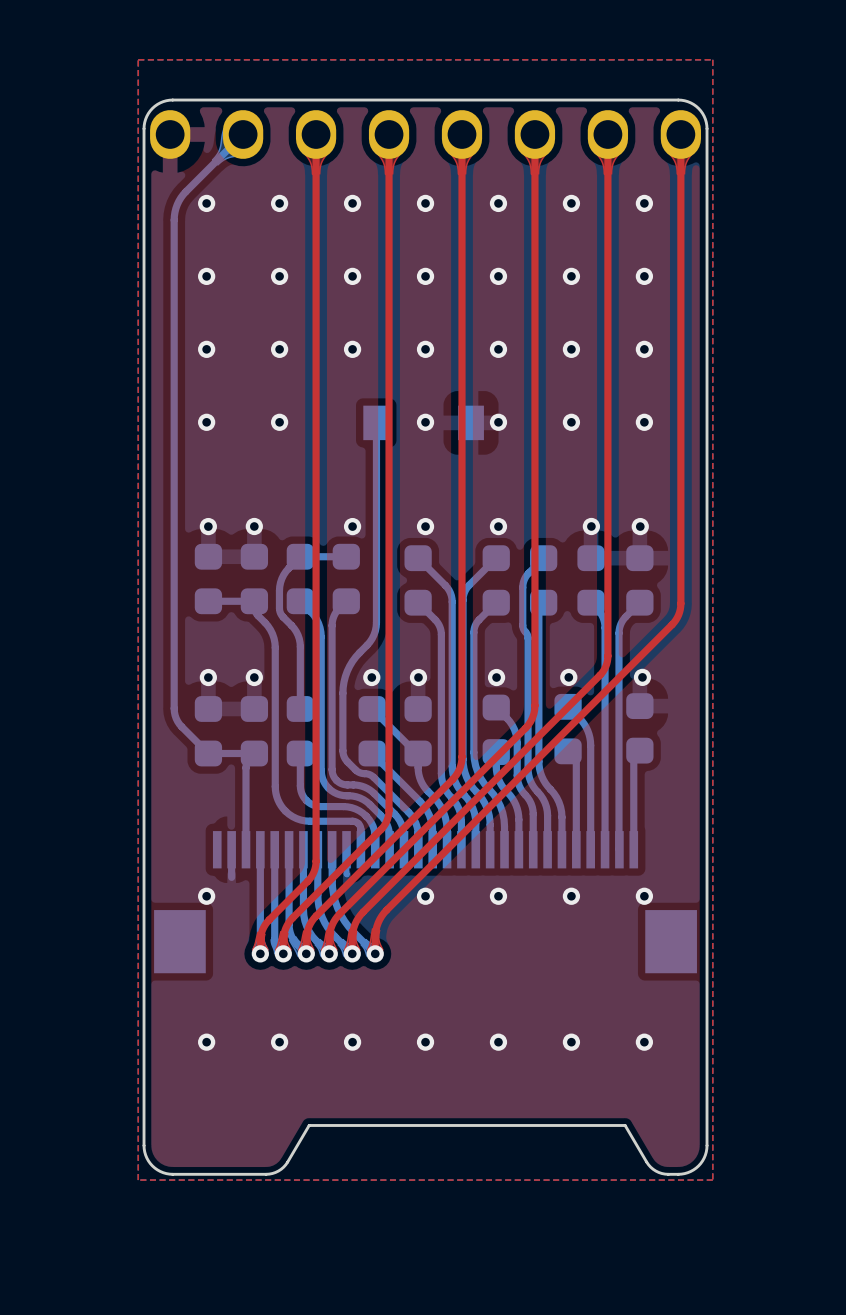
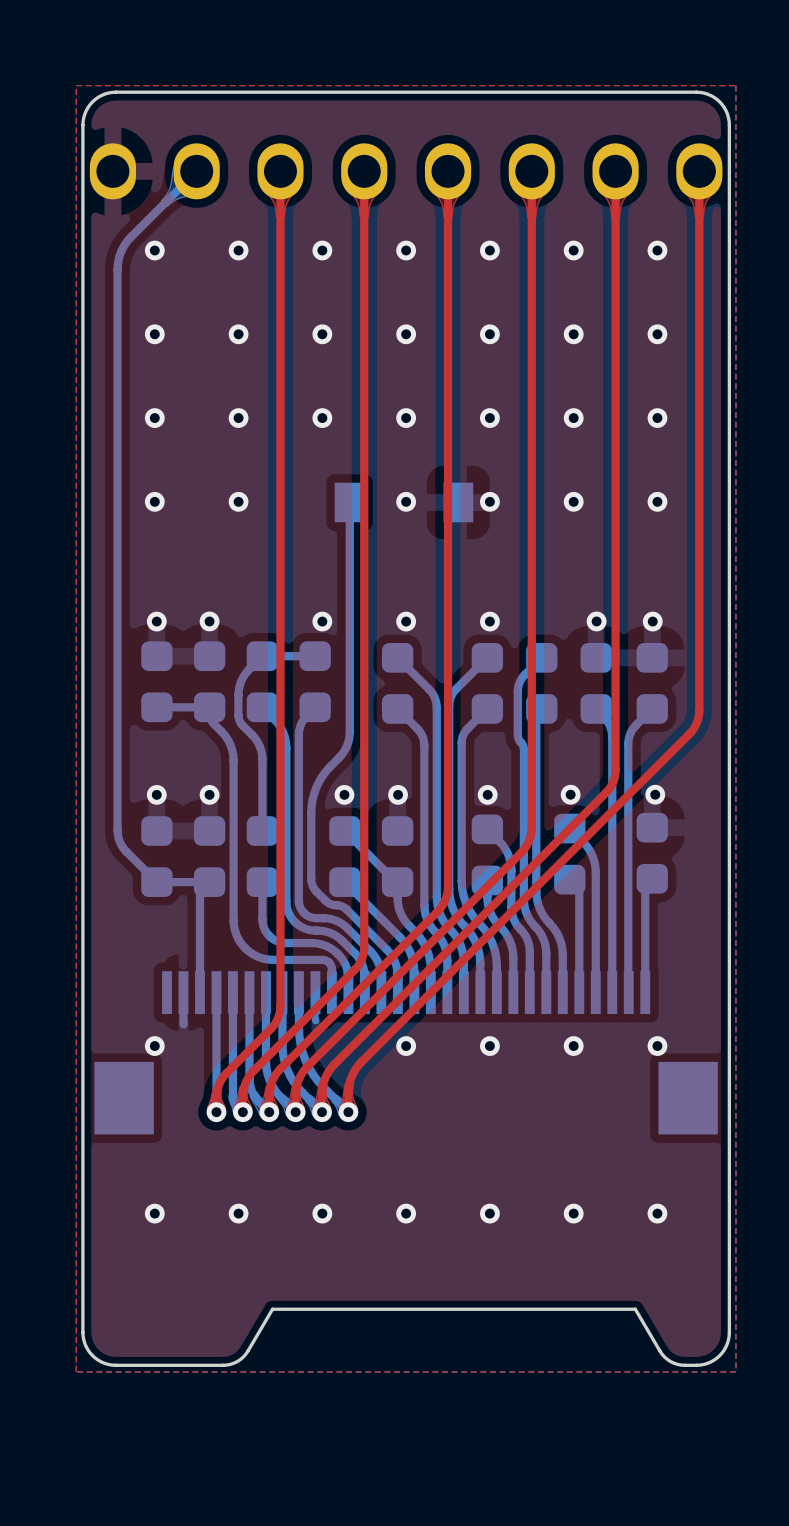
board edge: (144, 128) (146, 116) (152, 108) (163, 101) (172, 100) (678, 100) (690, 102) (698, 108) (704, 116) (707, 128) -> (82, 164) (83, 121) (86, 110) (98, 97) (115, 92) (700, 92) (716, 99) (727, 114) (729, 164)

